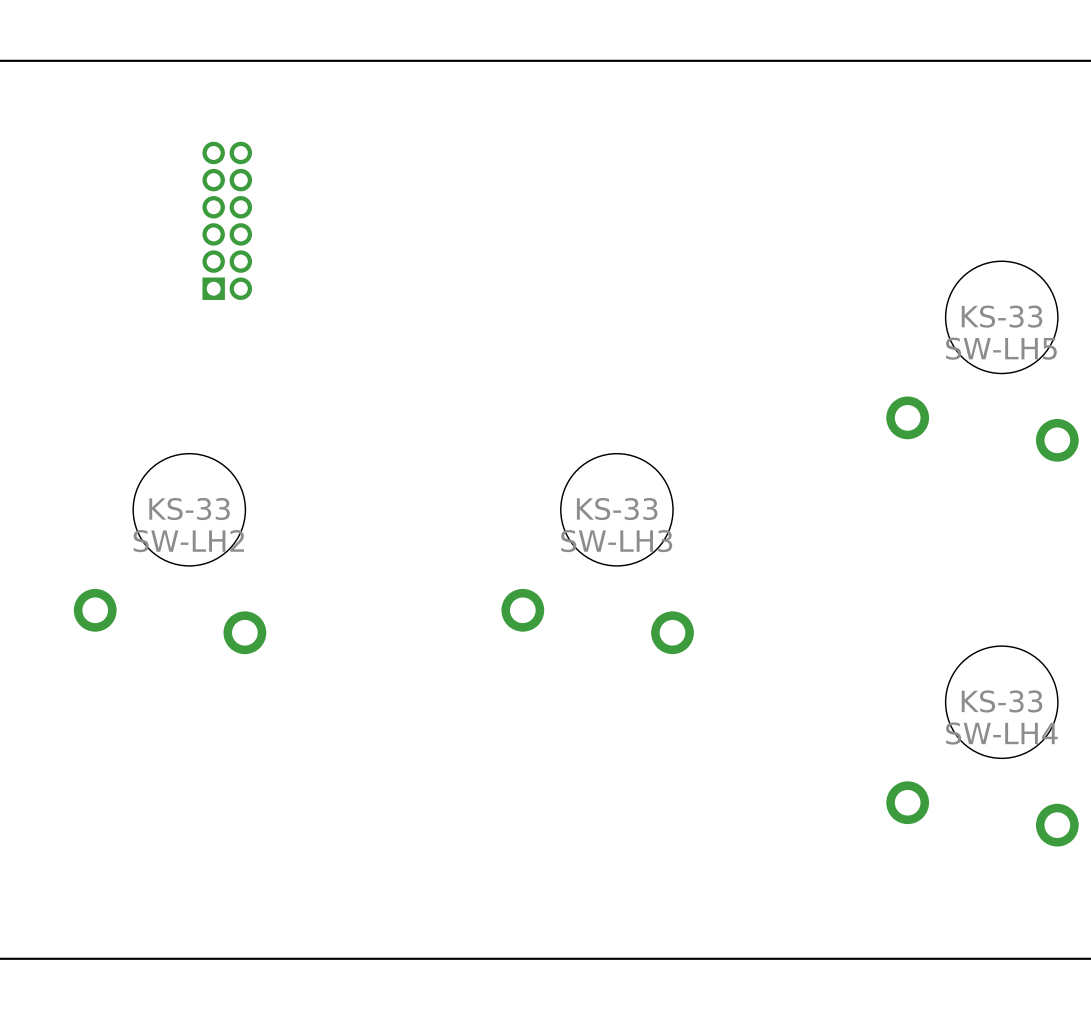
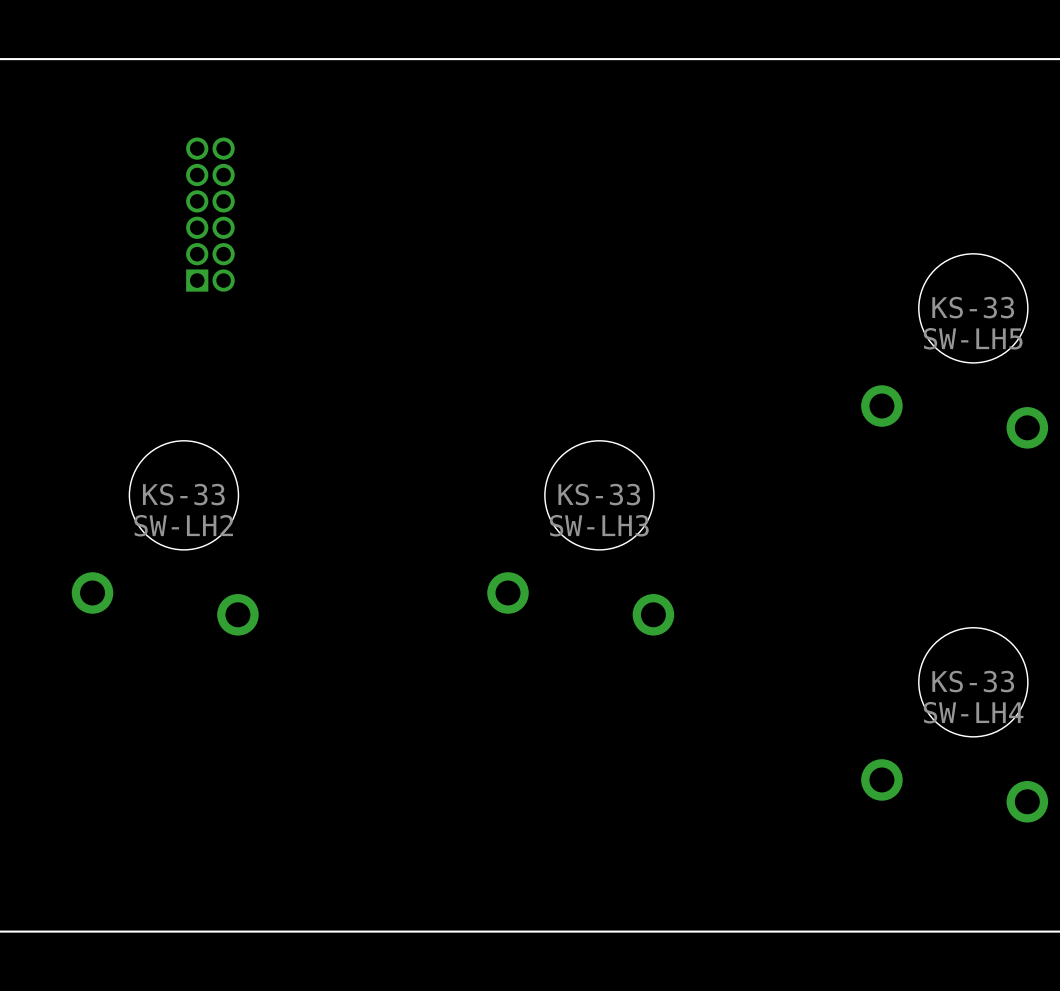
part footprint: [202, 141, 253, 300] -> [186, 137, 235, 292]

